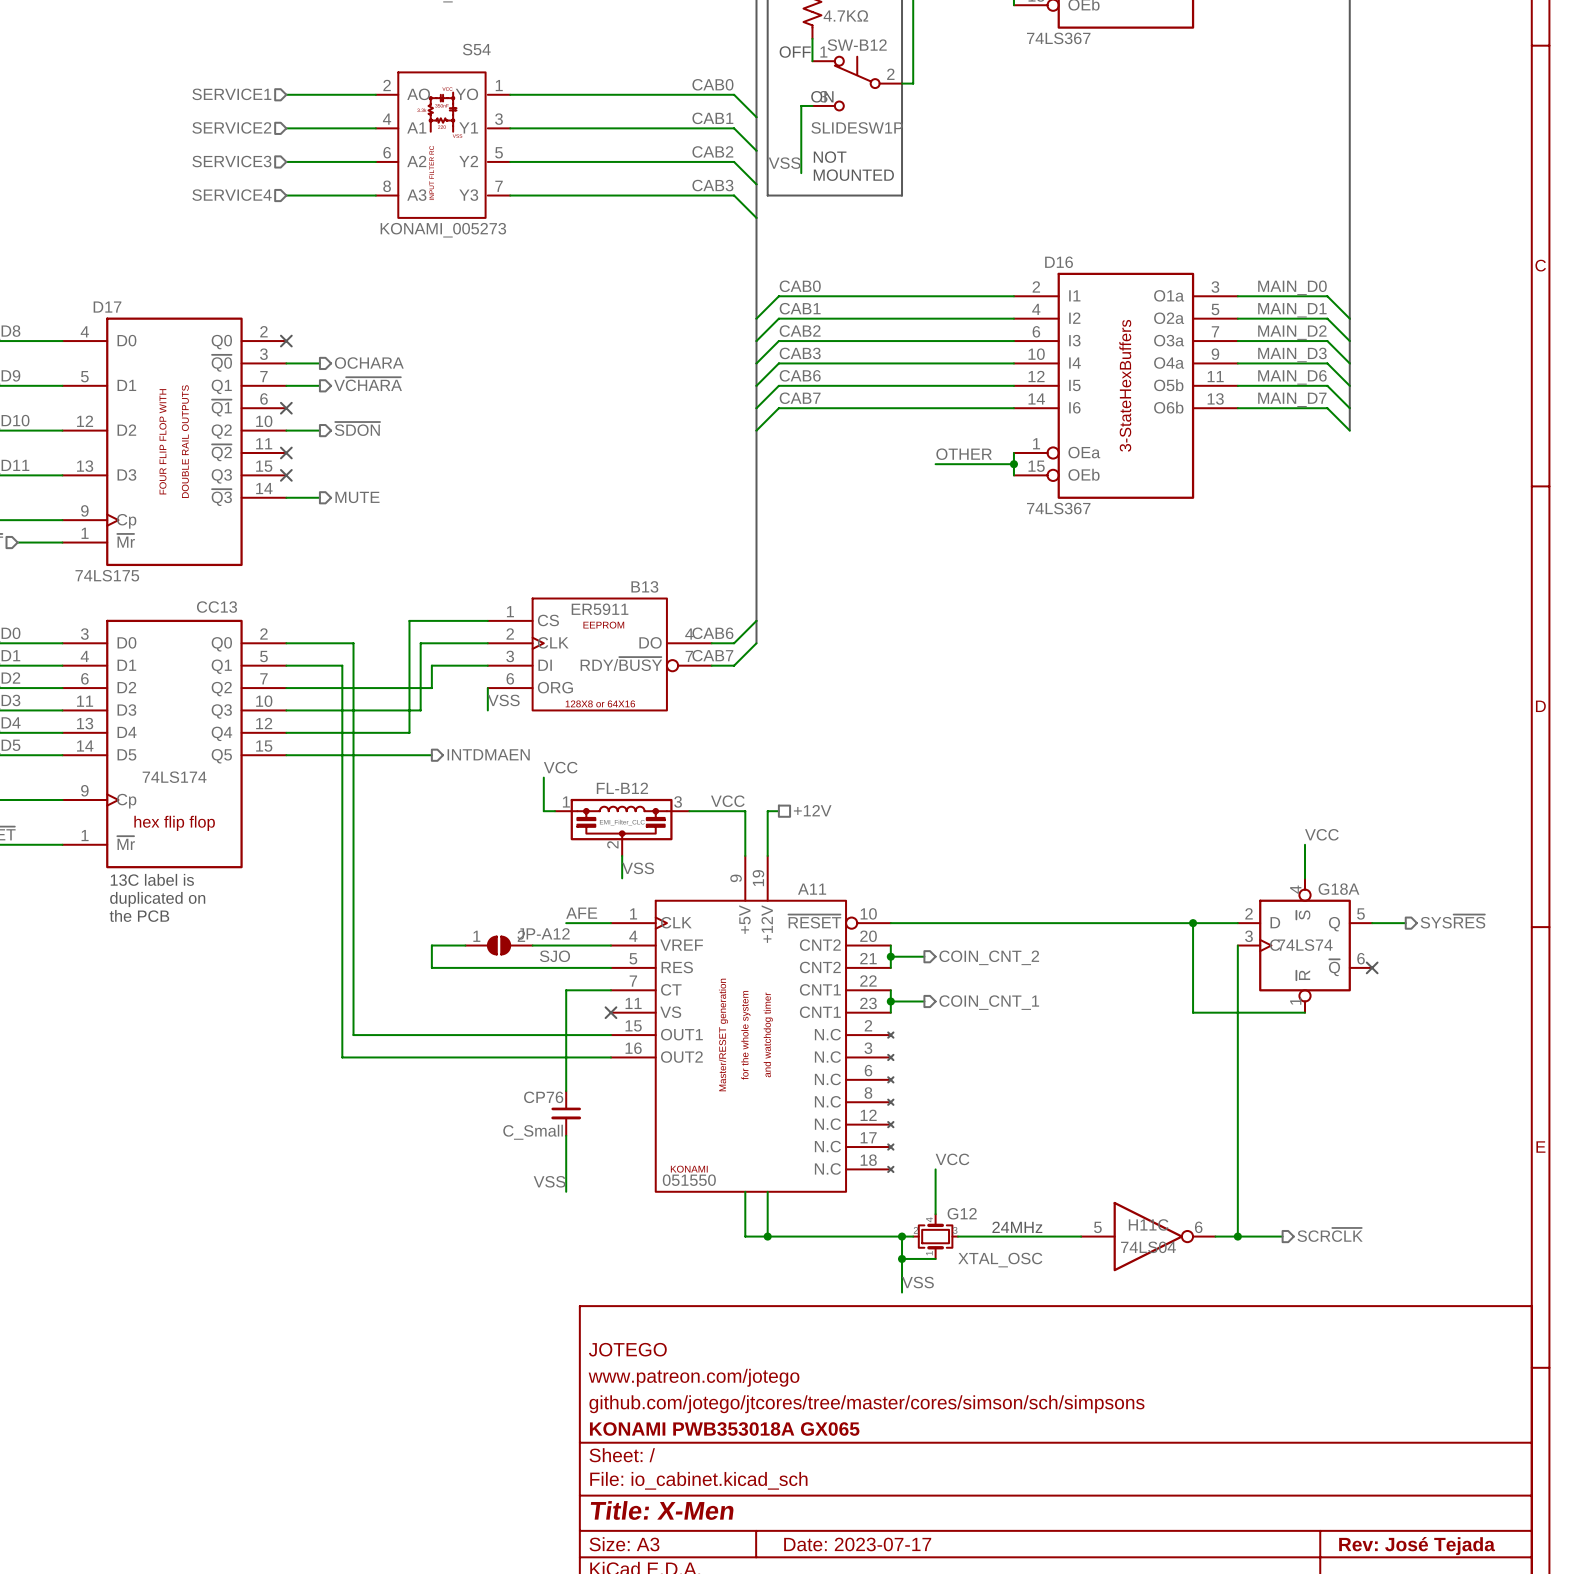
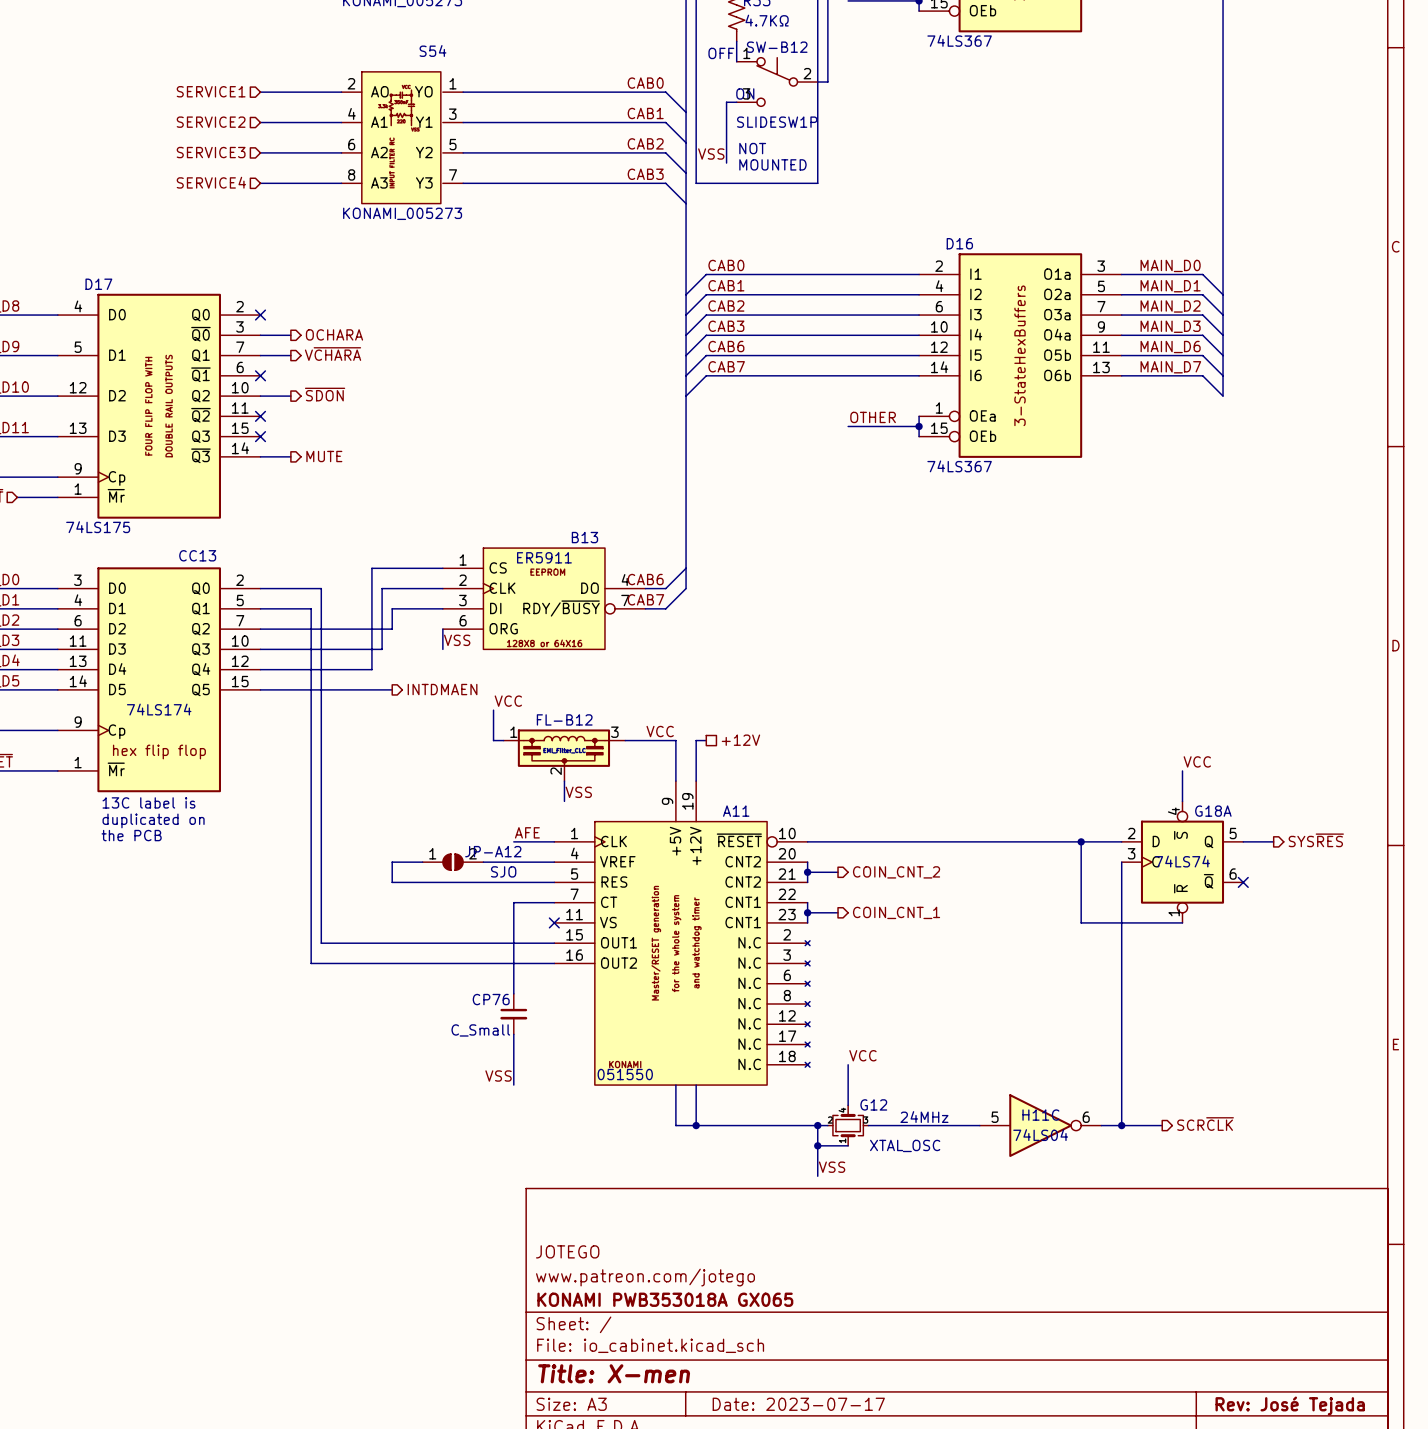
title block: JOTEGO (627, 1349) -> none
title block: www.patreon.com/jotego (694, 1377) -> JOTEGO (567, 1251)
title block: github.com/jotego/jtcores/tree/master/cores/simson/sch/simpsons (866, 1404) -> www.patreon.com/jotego (645, 1277)
title block: Title: X-Men (662, 1510) -> Title: X-men (614, 1373)

